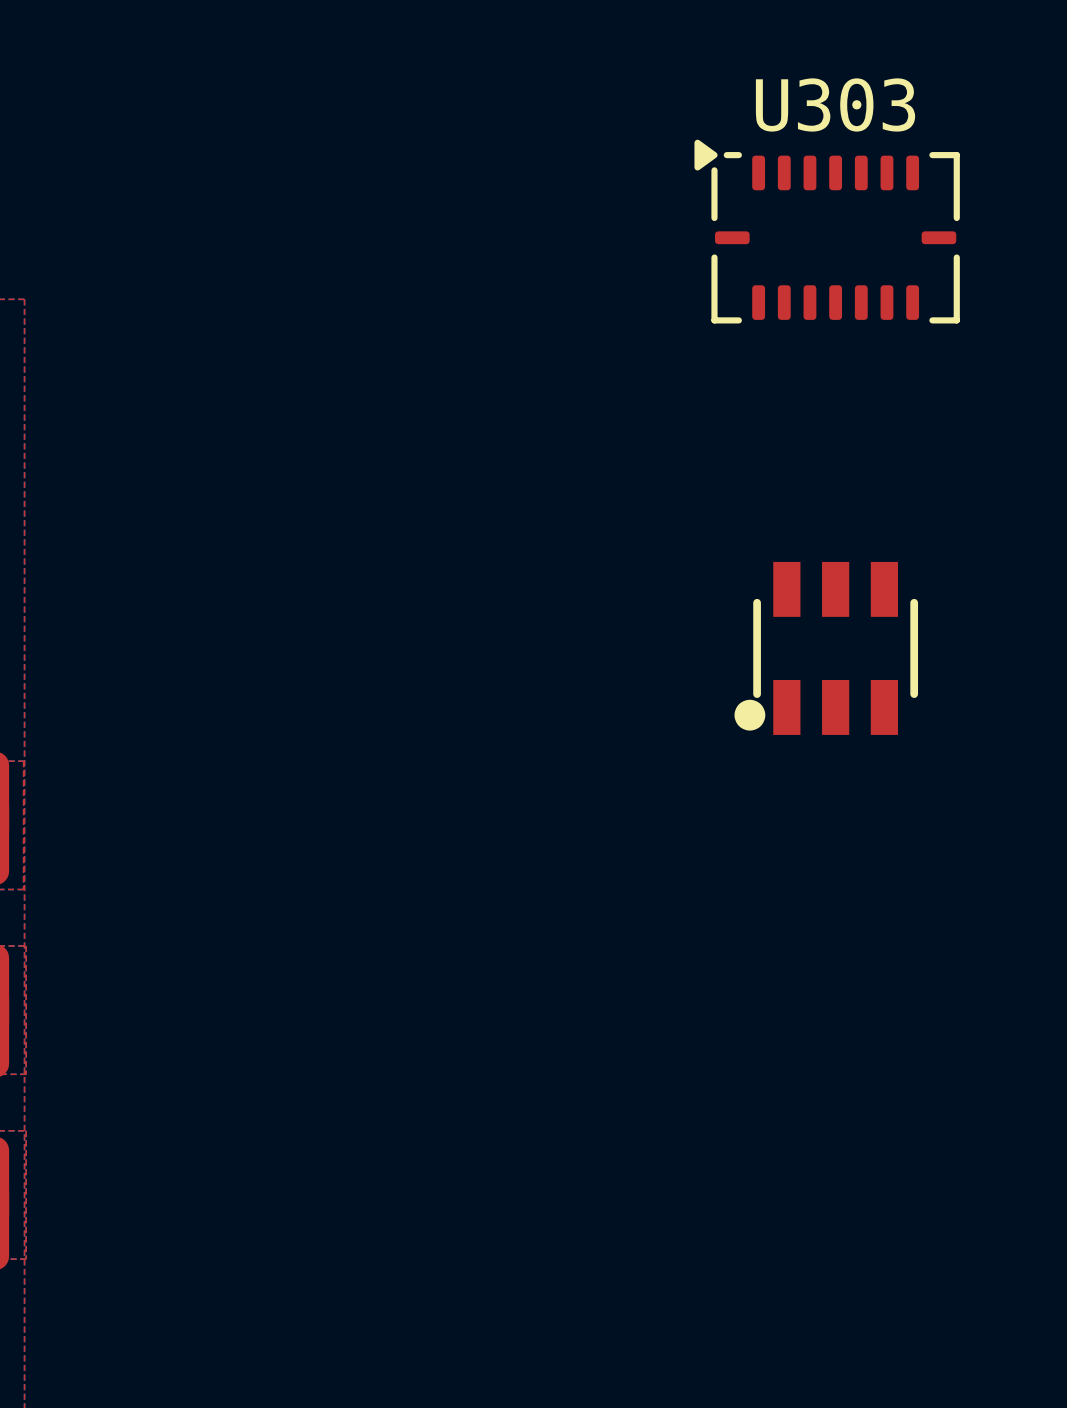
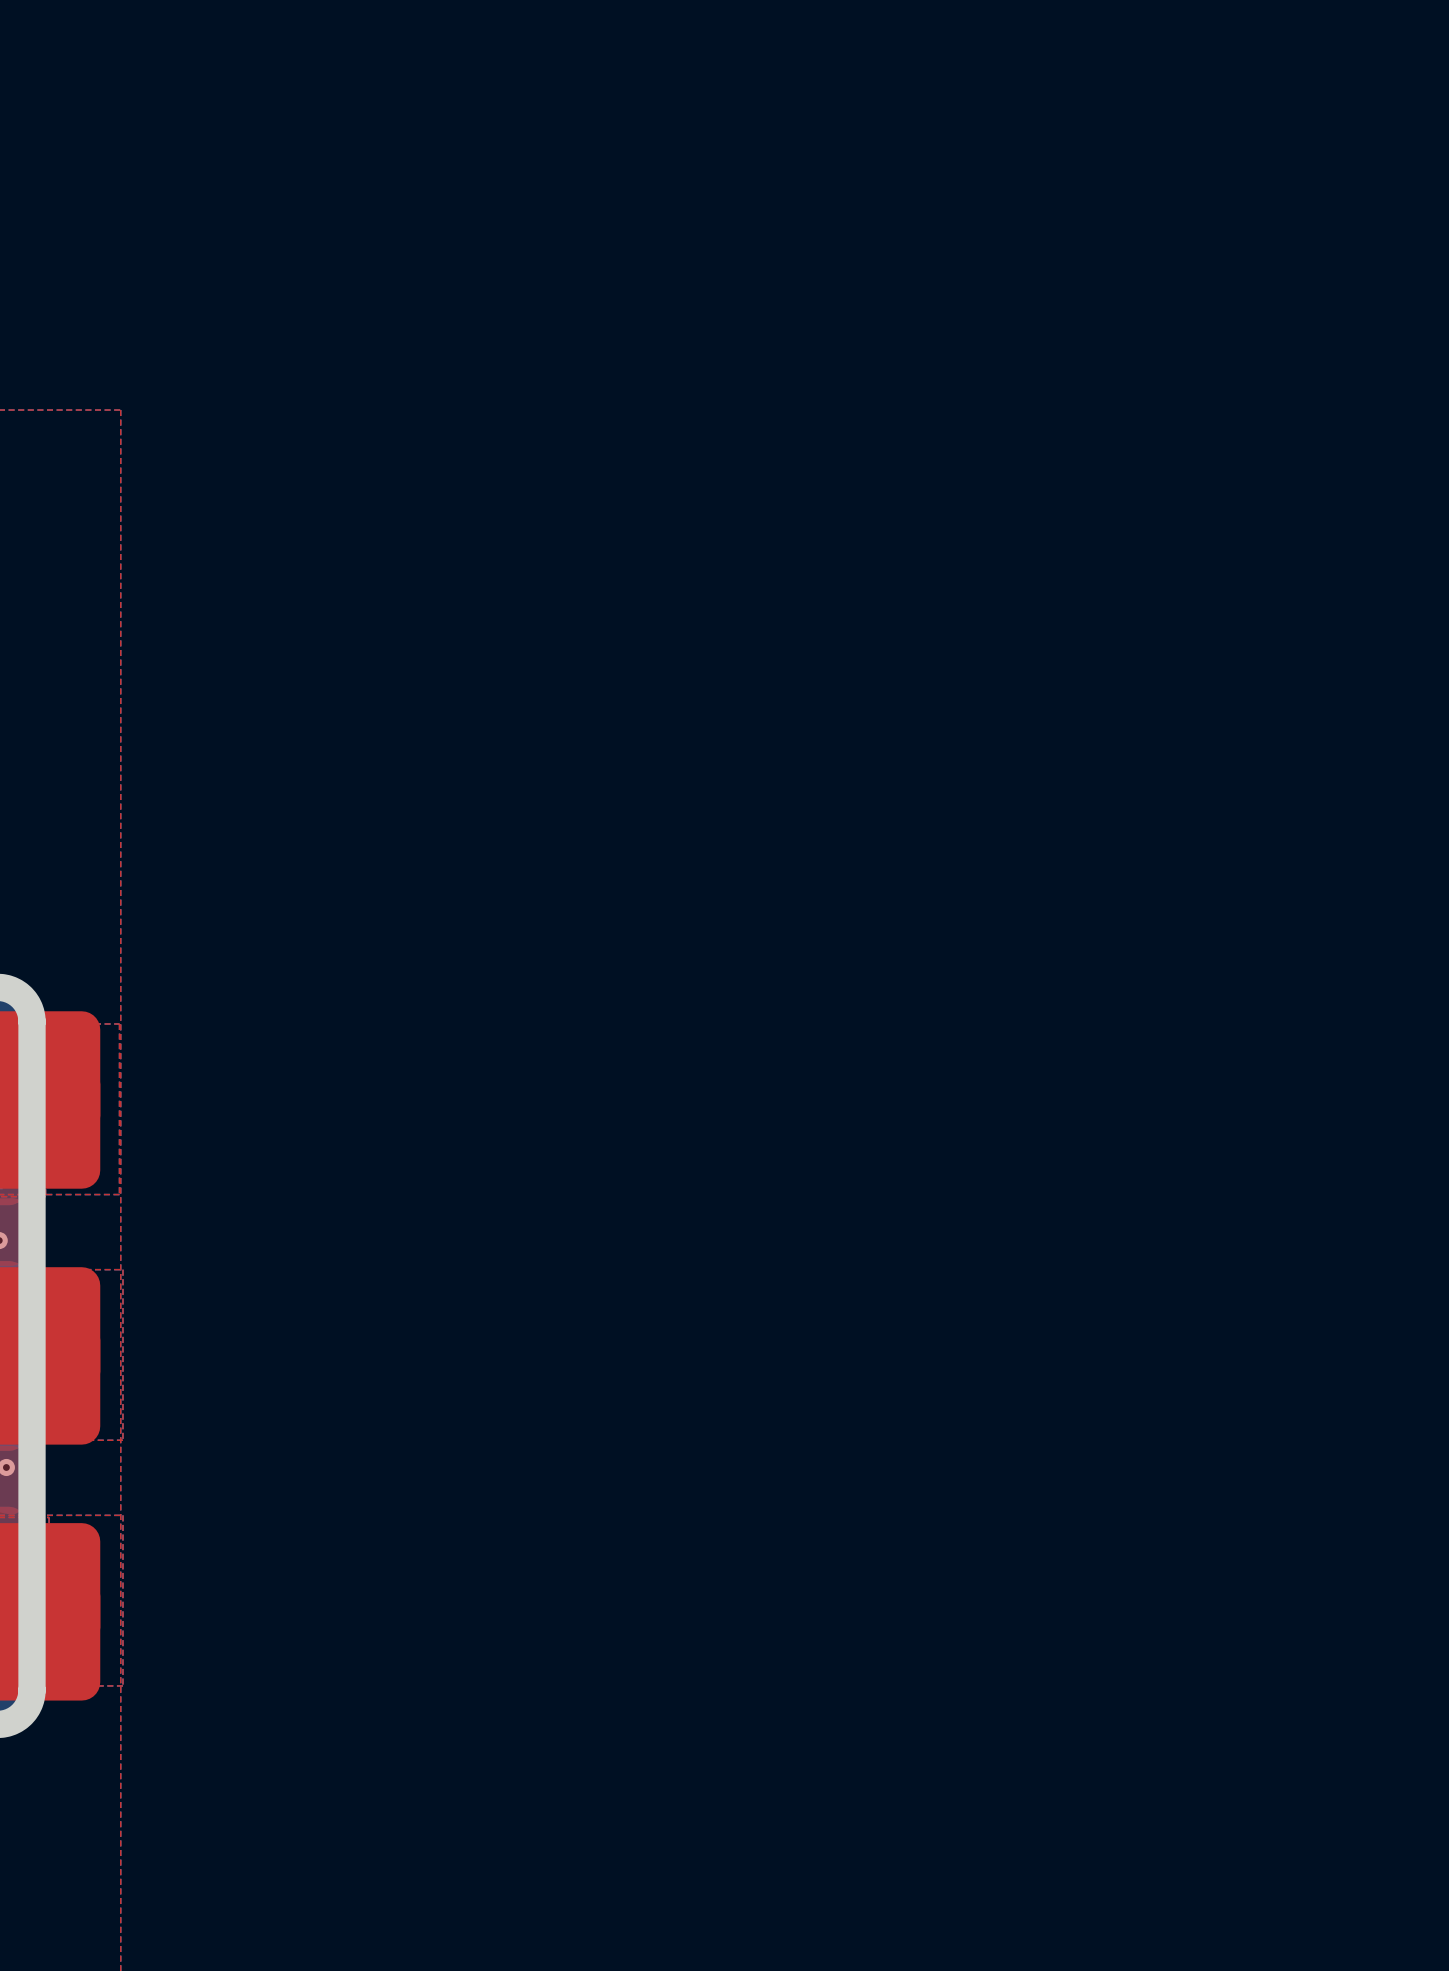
U303: (827, 231) -> none
part: (826, 648) -> none

